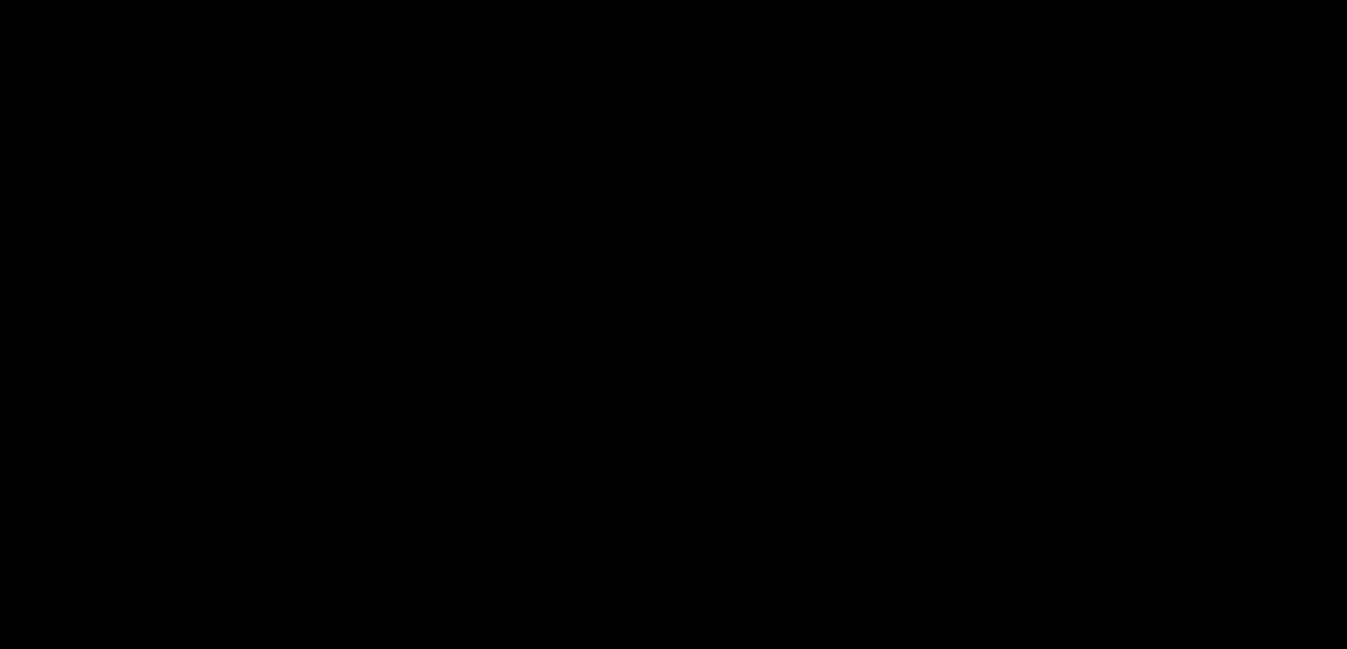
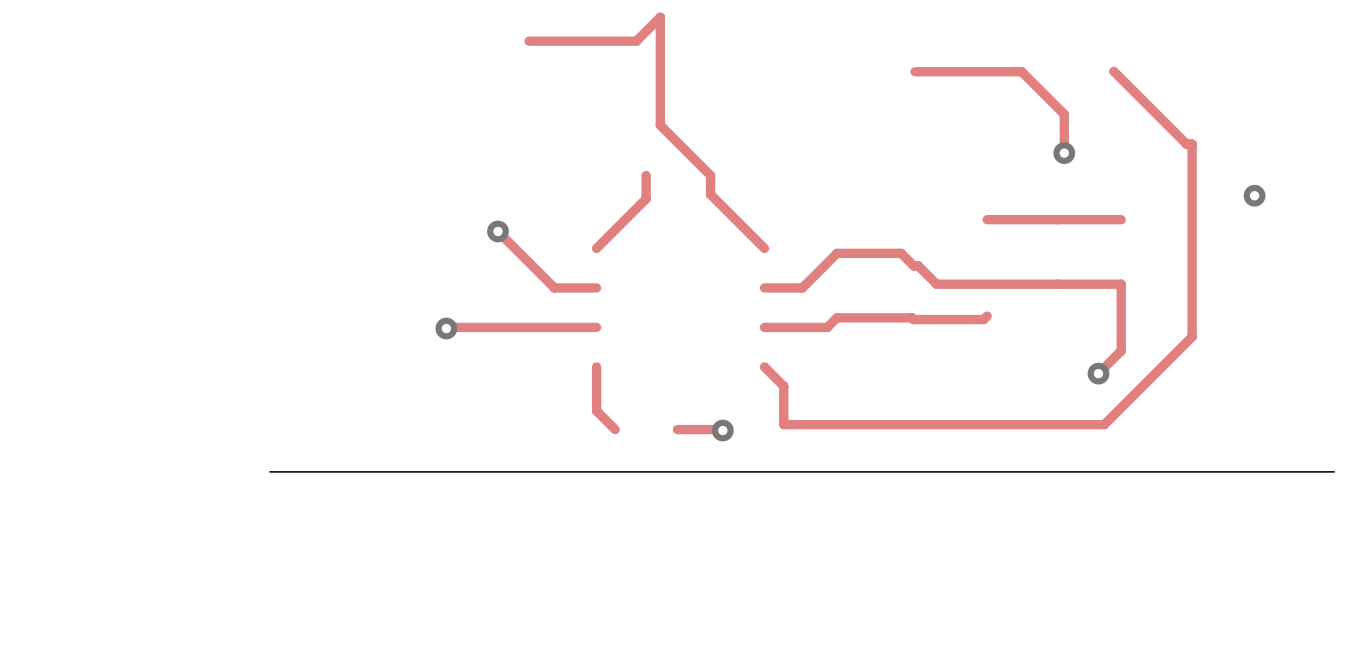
track: none -> (529, 41) (636, 41) (660, 17) (660, 125) (710, 175) (710, 194) (764, 248)
track: none -> (915, 71) (1021, 71) (1064, 114) (1064, 153)
track: none -> (1113, 71) (1186, 144) (1192, 144) (1192, 336) (1104, 424) (784, 424)
via: none -> (1064, 153)
track: none -> (646, 175) (646, 198) (596, 248)
via: none -> (1254, 195)
track: none -> (987, 219) (1121, 219)
track: none -> (497, 231) (554, 287) (596, 287)
via: none -> (497, 231)
track: none -> (764, 287) (802, 287) (836, 253) (901, 253) (913, 265) (918, 265) (936, 284) (1121, 284) (1121, 350) (1098, 373)
track: none -> (987, 316) (983, 319) (836, 317) (827, 327) (764, 327)
track: none -> (596, 327) (446, 328)
via: none -> (446, 328)
track: none -> (596, 366) (596, 410) (615, 429)
track: none -> (764, 366) (783, 386) (783, 424)
via: none -> (1098, 373)
track: none -> (677, 429) (722, 430)
via: none -> (722, 430)
board edge: none -> (269, 471) (1334, 471)

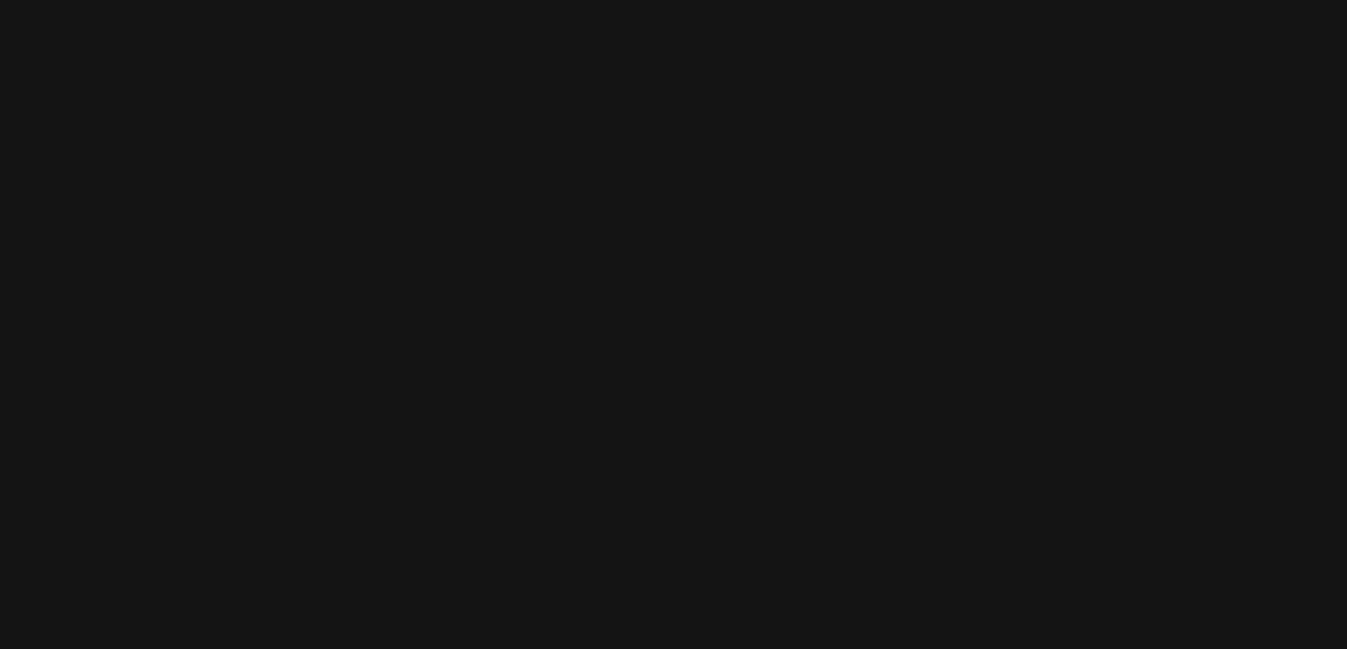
track: (529, 41) (636, 41) (660, 17) (660, 125) (710, 175) (710, 194) (764, 248) -> none
track: (915, 71) (1021, 71) (1064, 114) (1064, 153) -> none
track: (1113, 71) (1186, 144) (1192, 144) (1192, 336) (1104, 424) (784, 424) -> none
via: (1064, 153) -> none
track: (646, 175) (646, 198) (596, 248) -> none
via: (1254, 195) -> none
track: (987, 219) (1121, 219) -> none
track: (497, 231) (554, 287) (596, 287) -> none
via: (497, 231) -> none
track: (764, 287) (802, 287) (836, 253) (901, 253) (913, 265) (918, 265) (936, 284) (1121, 284) (1121, 350) (1098, 373) -> none
track: (987, 316) (983, 319) (836, 317) (827, 327) (764, 327) -> none
track: (596, 327) (446, 328) -> none
via: (446, 328) -> none
track: (596, 366) (596, 410) (615, 429) -> none
track: (764, 366) (783, 386) (783, 424) -> none
via: (1098, 373) -> none
track: (677, 429) (722, 430) -> none
via: (722, 430) -> none
board edge: (269, 471) (1334, 471) -> none

